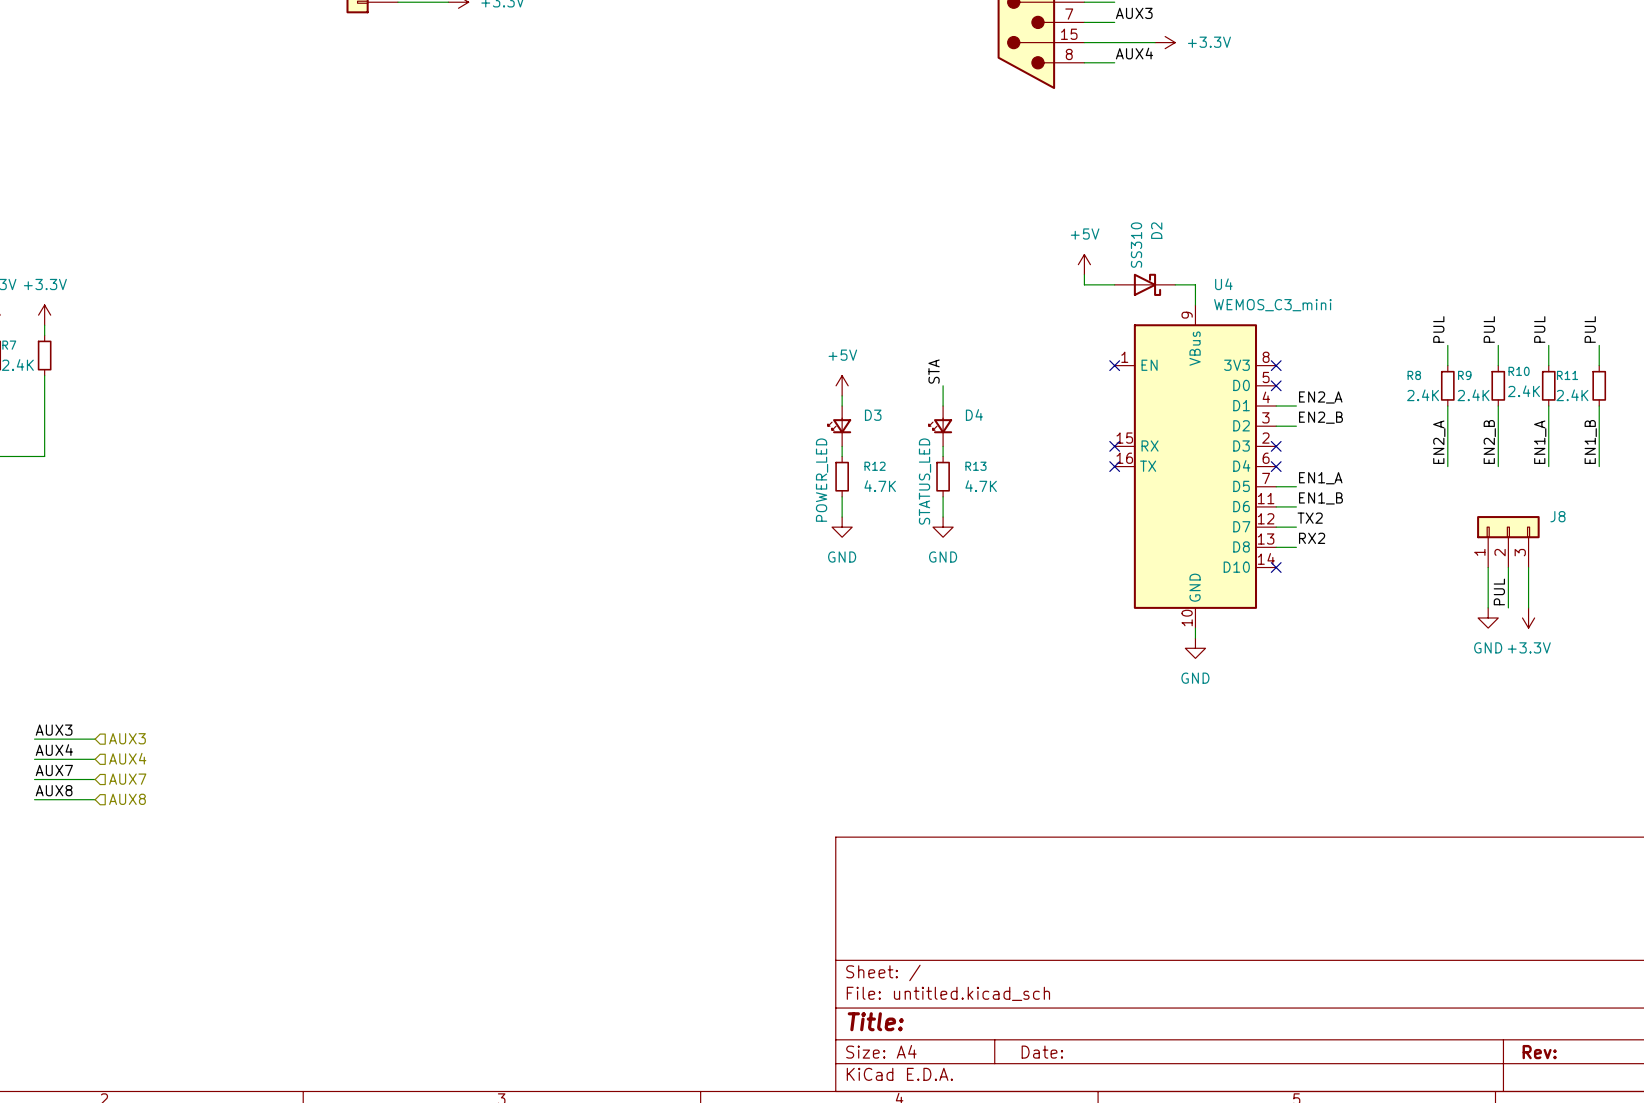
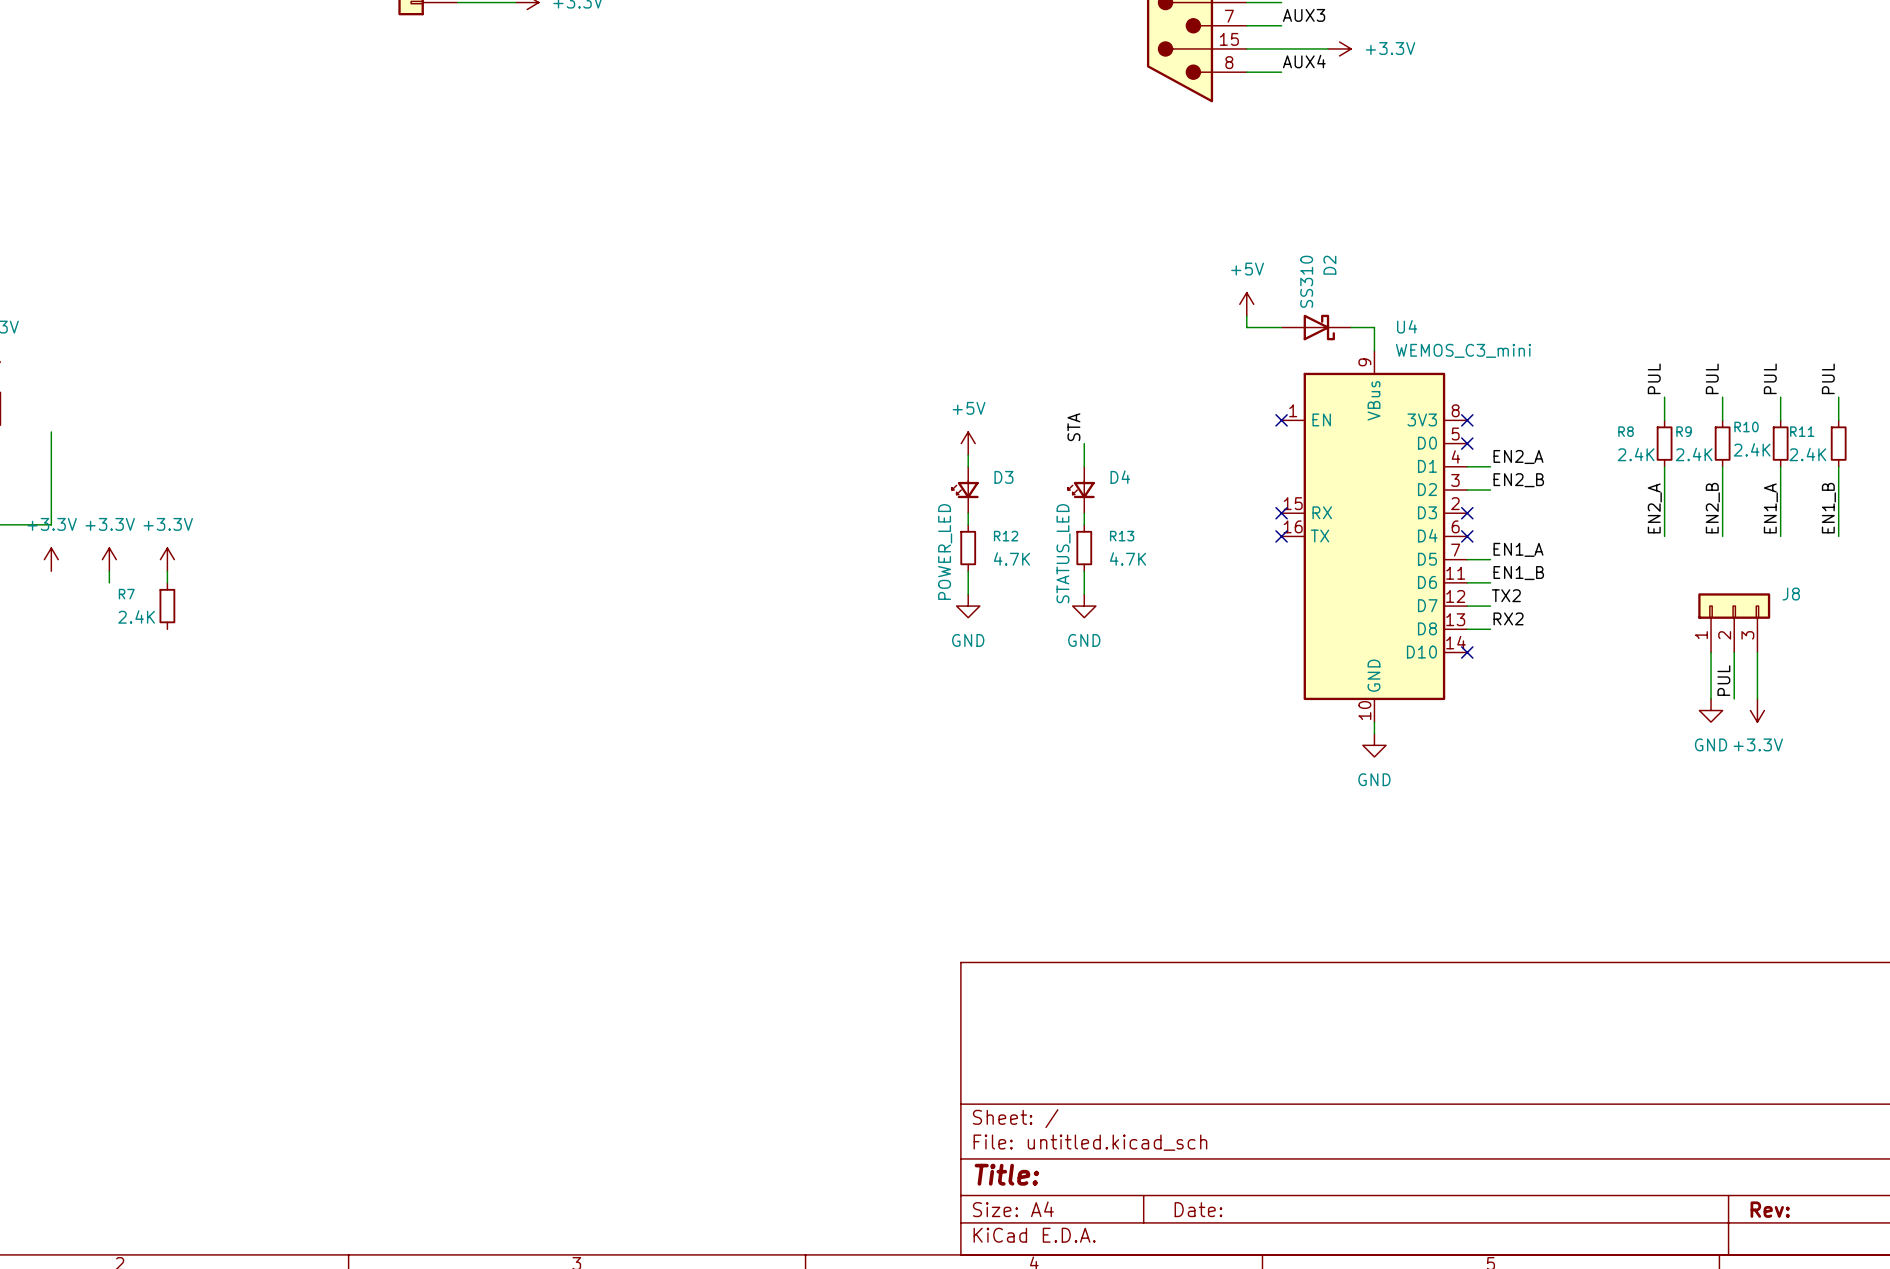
power symbol: +3.3V (44, 315) -> none
wire: (44, 325) (44, 335) -> (109, 571) (109, 582)
R7 position: (44, 355) -> (167, 606)
power symbol: none -> +3.3V (51, 559)
power symbol: none -> +3.3V (109, 559)
power symbol: none -> +3.3V (167, 559)
wire: none -> (167, 571) (167, 582)
label: AUX3 (54, 730) -> none
hierarchical label: AUX3 (127, 738) -> none
wire: (34, 739) (95, 739) -> none
label: AUX4 (54, 750) -> none
hierarchical label: AUX4 (127, 758) -> none
wire: (34, 759) (95, 759) -> none
label: AUX7 (54, 770) -> none
wire: (34, 779) (95, 779) -> none
hierarchical label: AUX7 (127, 779) -> none
label: AUX8 (54, 790) -> none
wire: (34, 799) (95, 799) -> none
hierarchical label: AUX8 (127, 799) -> none

